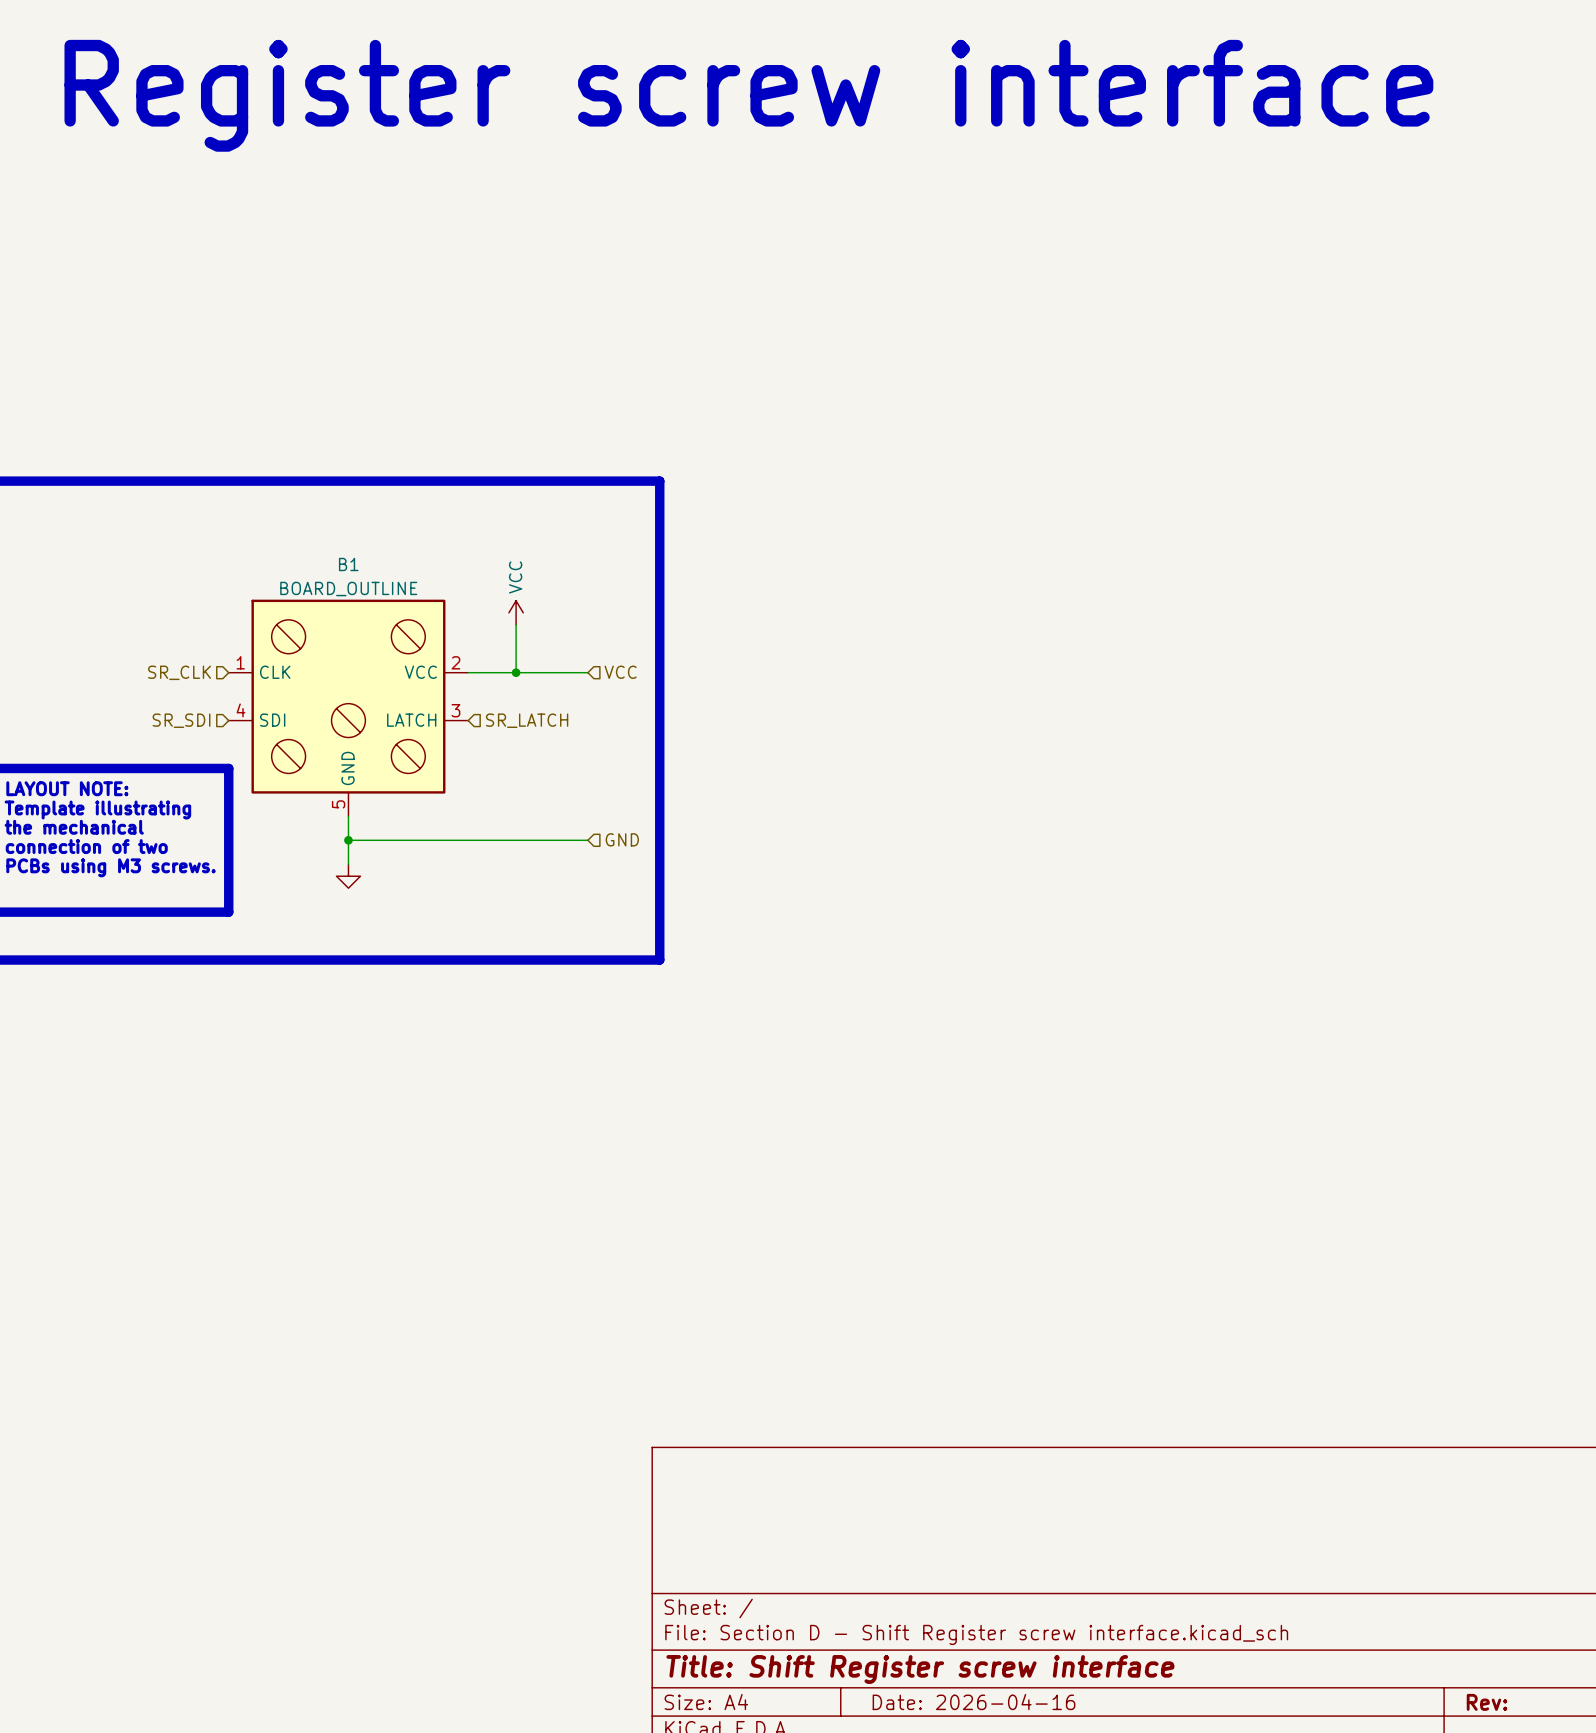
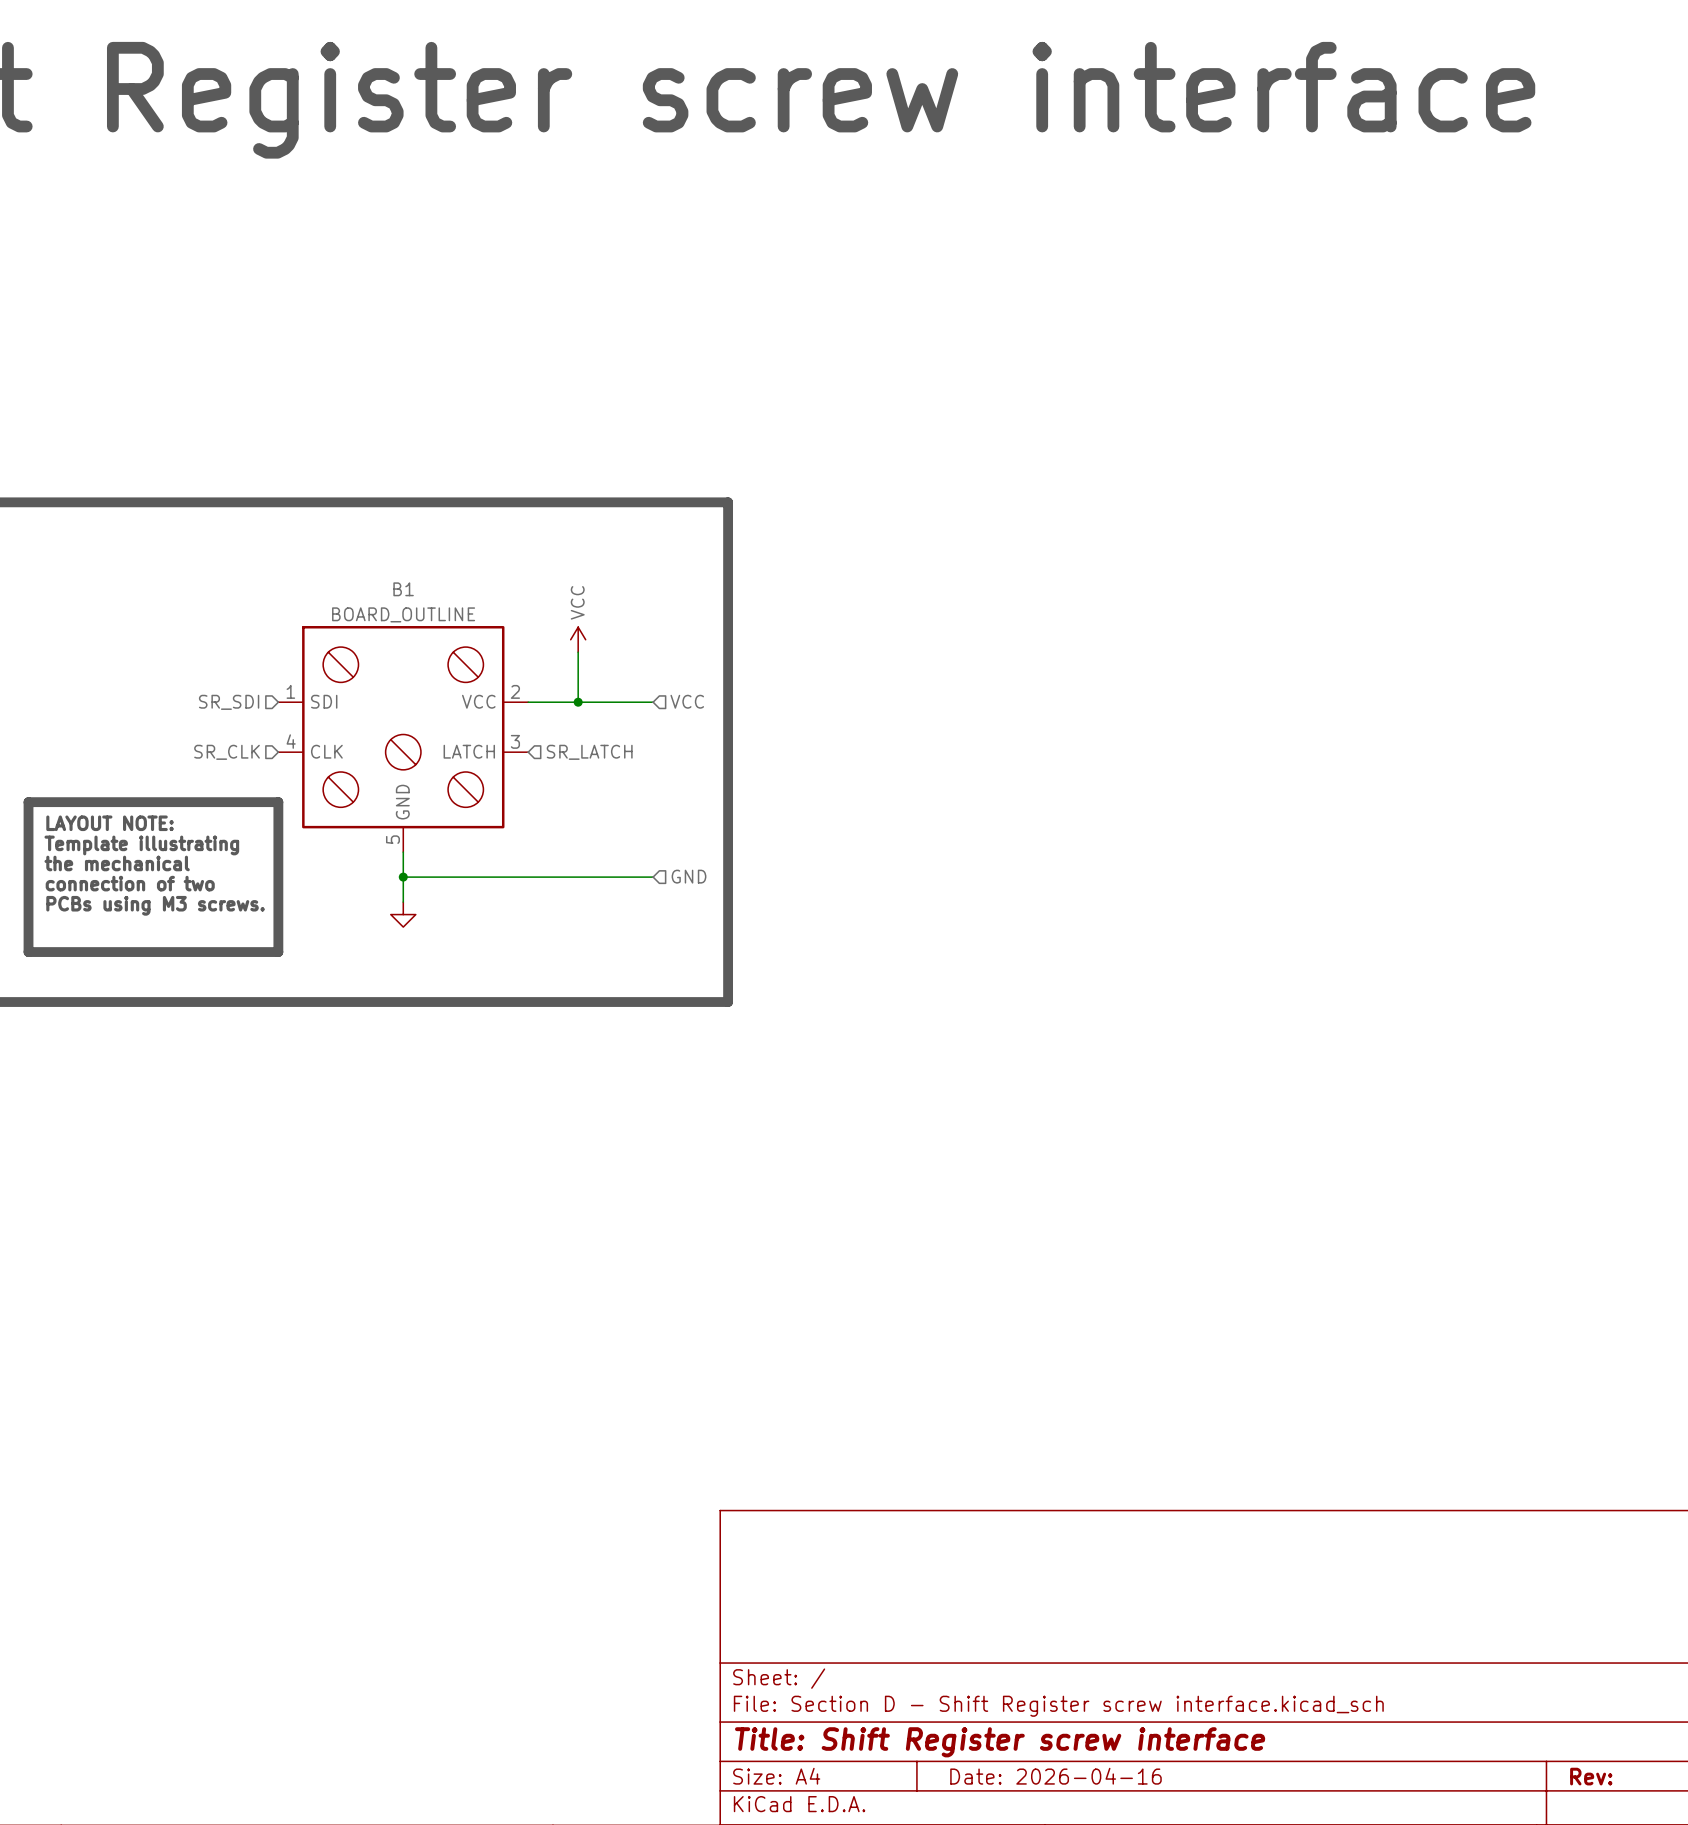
hierarchical label: SR_CLK (179, 672) -> SR_SDI (229, 702)
B1 pin name: CLK (275, 672) -> SDI (324, 701)
hierarchical label: SR_SDI (181, 720) -> SR_CLK (227, 752)
B1 pin name: SDI (272, 720) -> CLK (326, 751)

